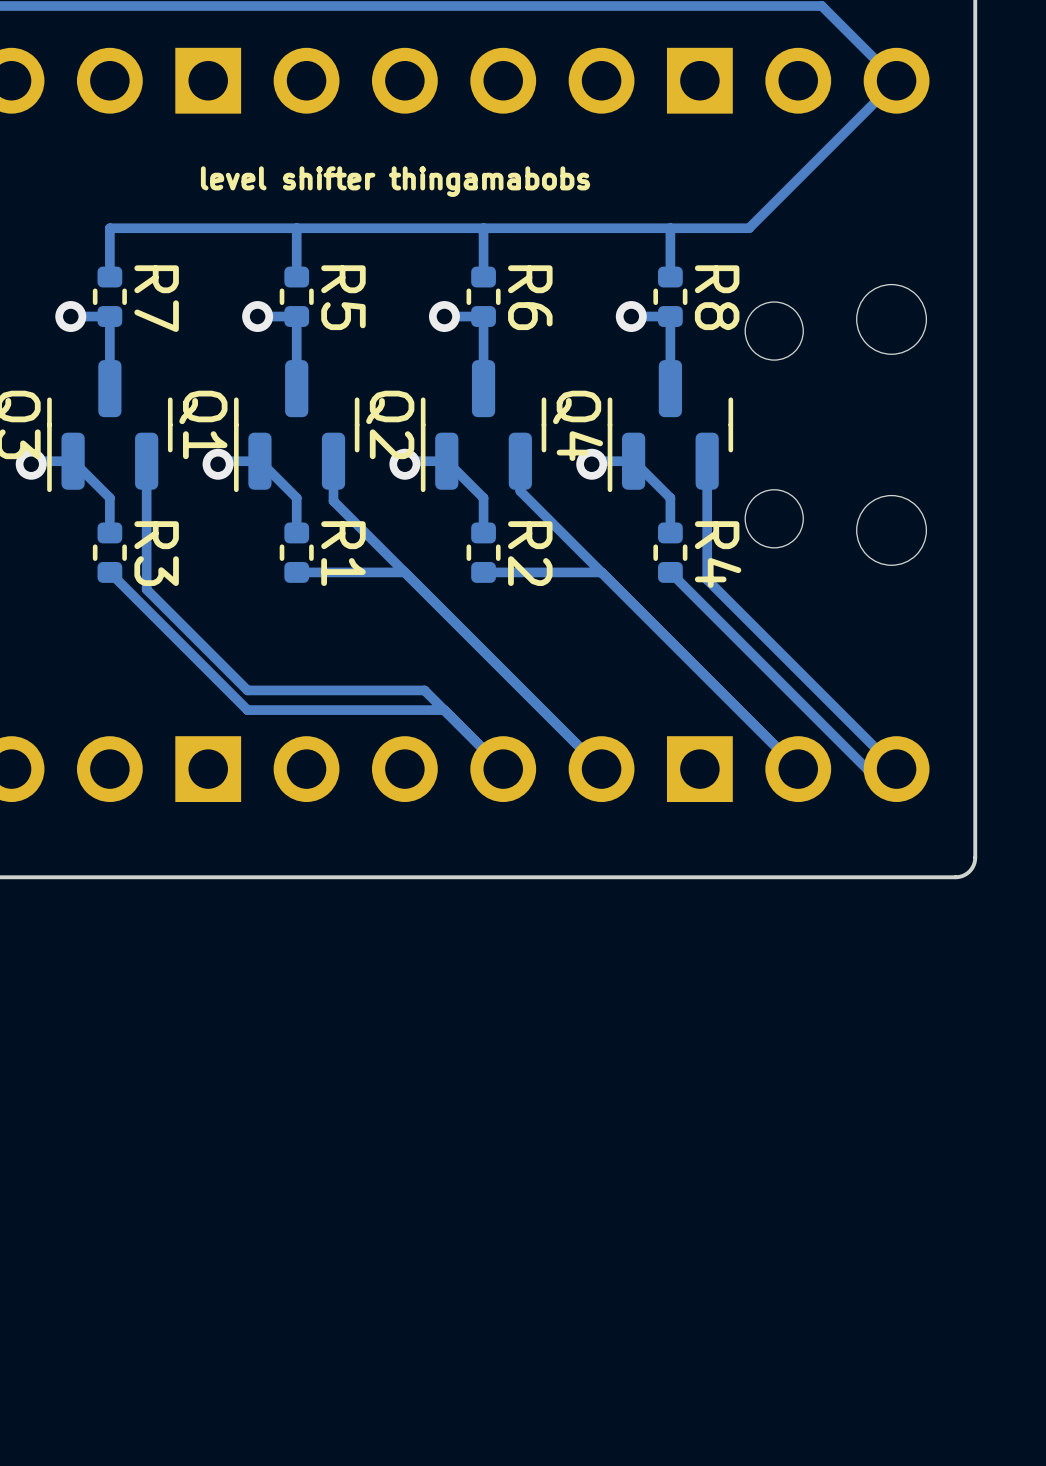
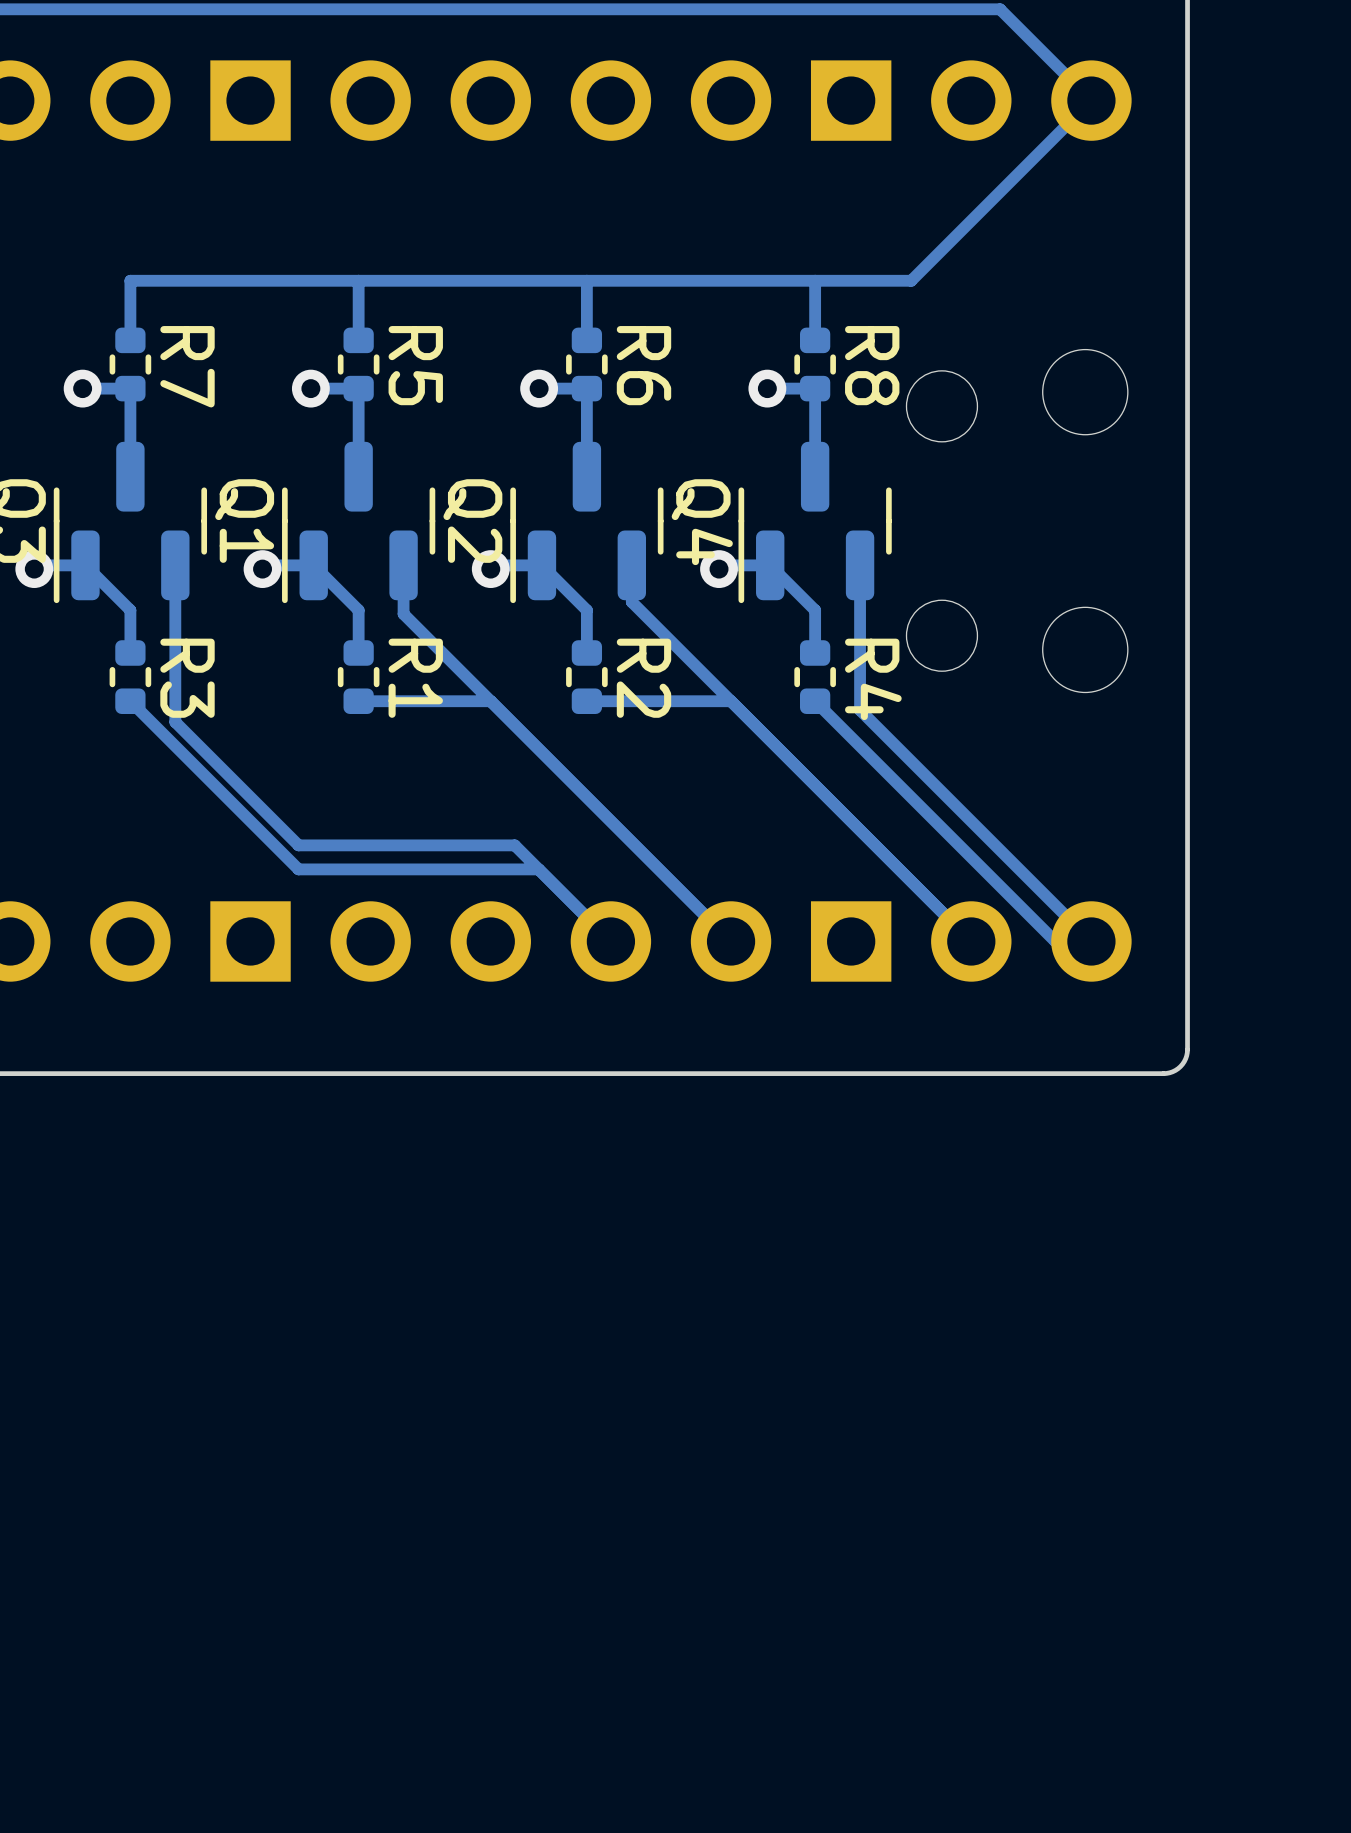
text: level shifter thingamabobs (395, 181) -> none

